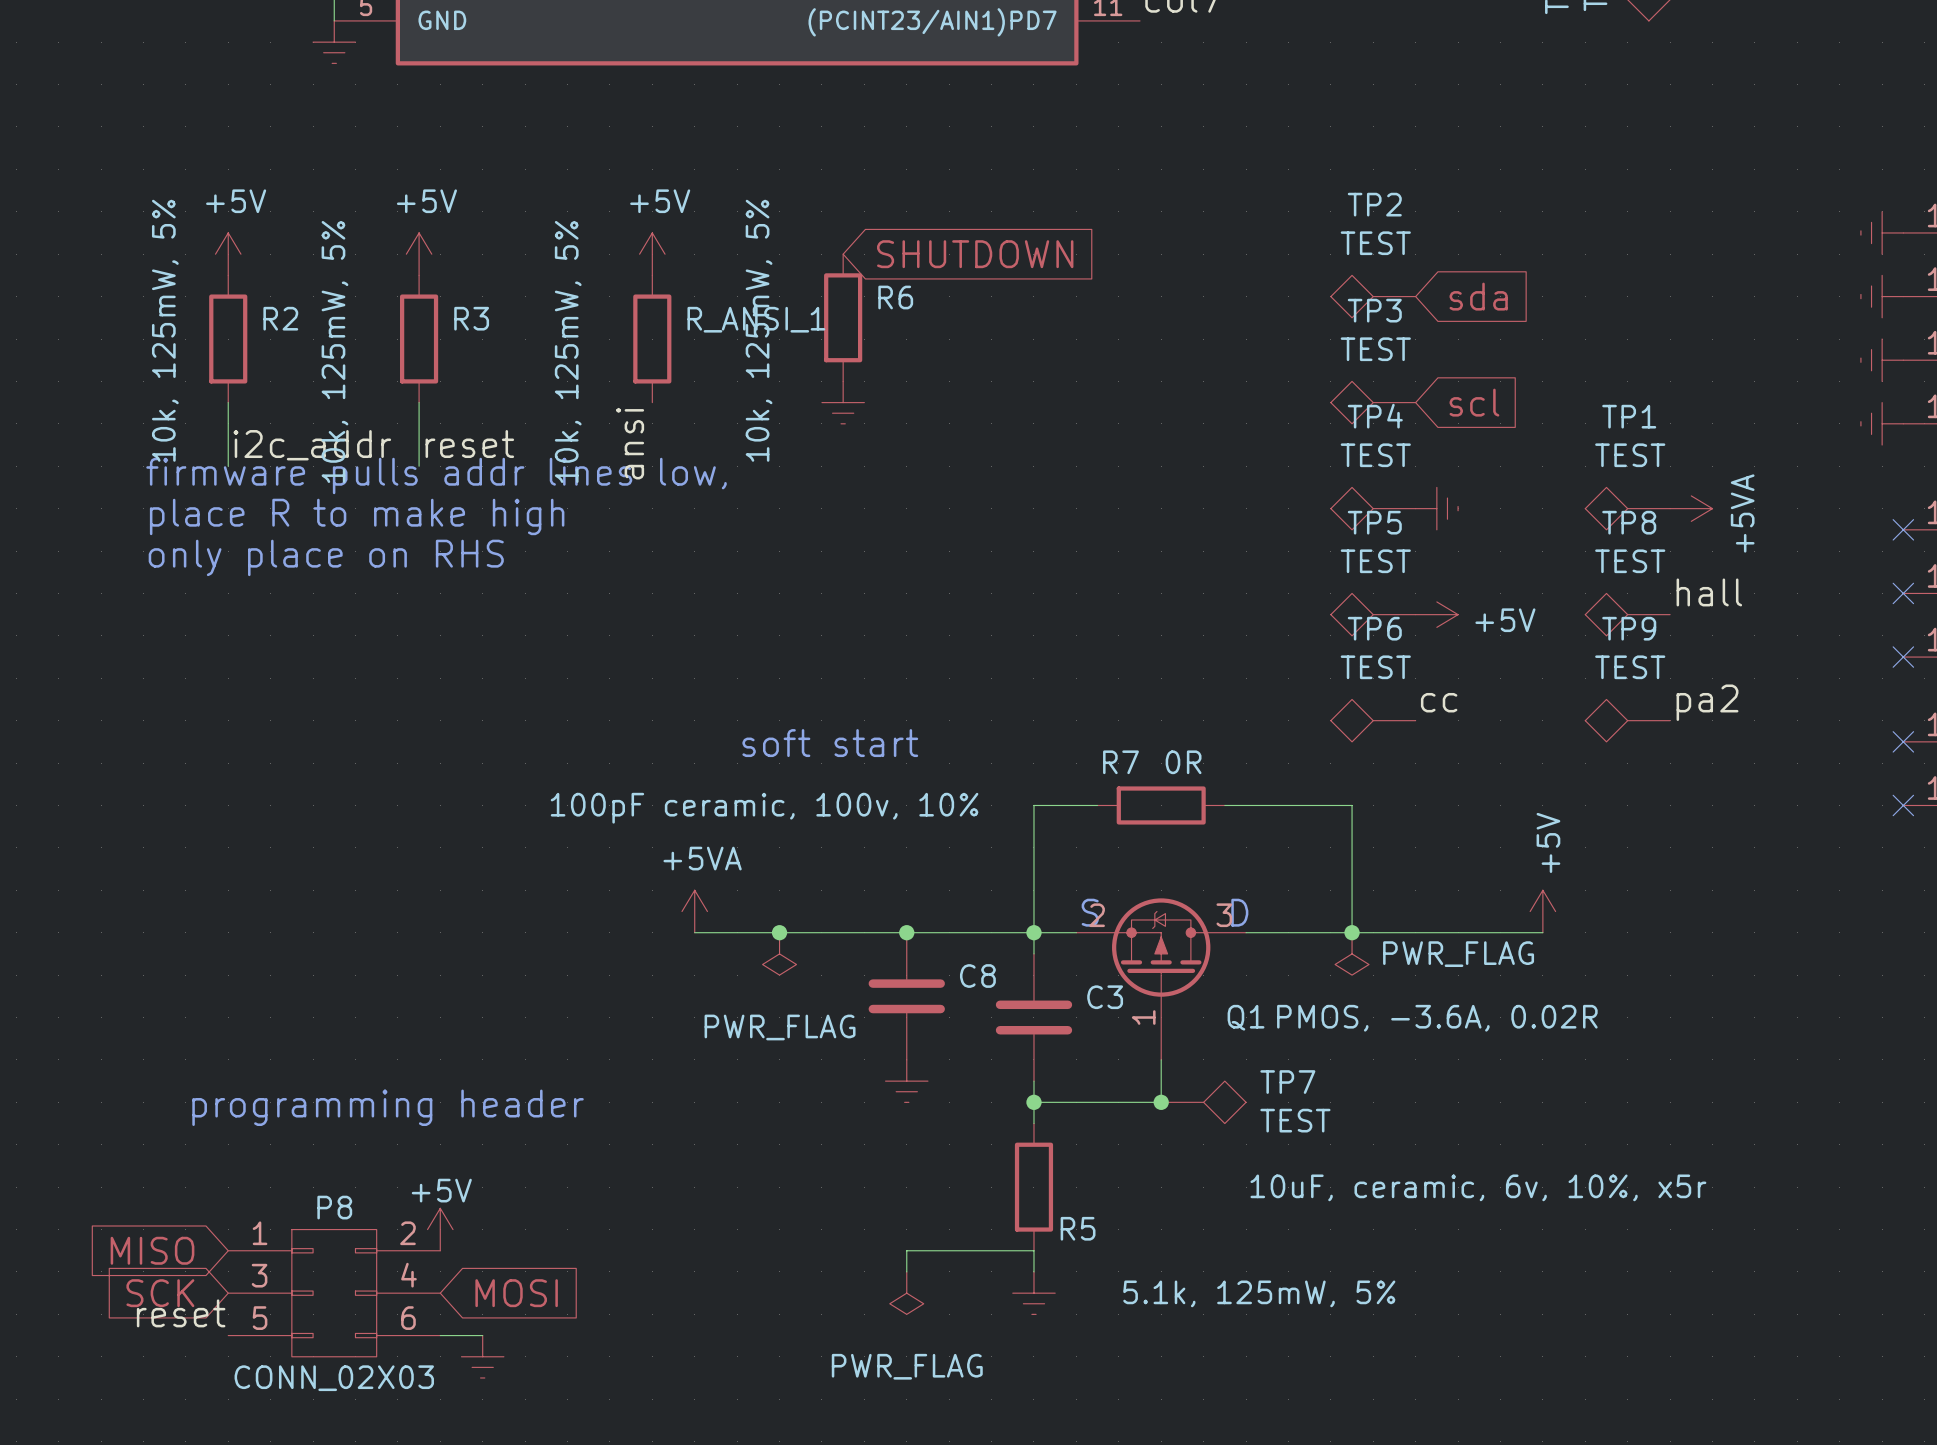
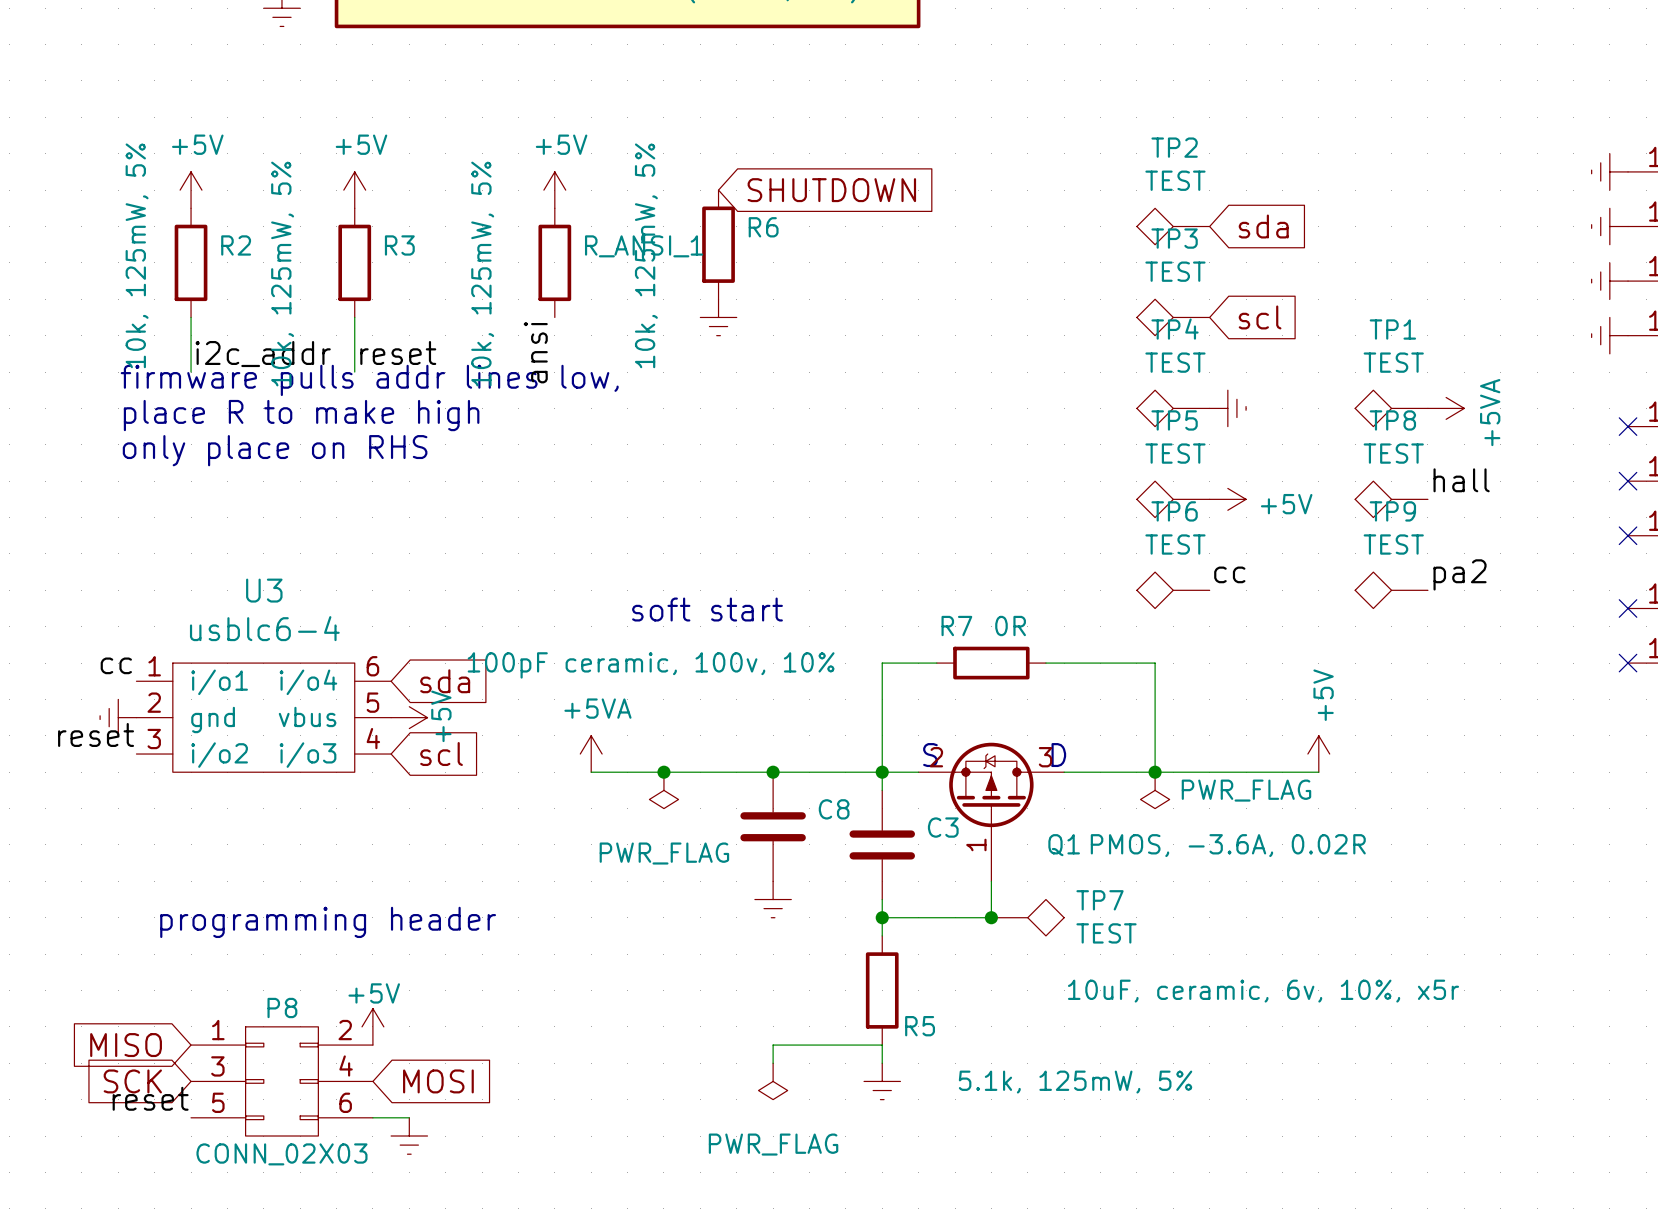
label: none -> cc (116, 665)
global label: none -> sda (445, 681)
power symbol: none -> (118, 717)
U3: none -> usblc6-4 (263, 717)
power symbol: none -> +5V (409, 717)
label: none -> reset (96, 734)
global label: none -> scl (441, 754)

